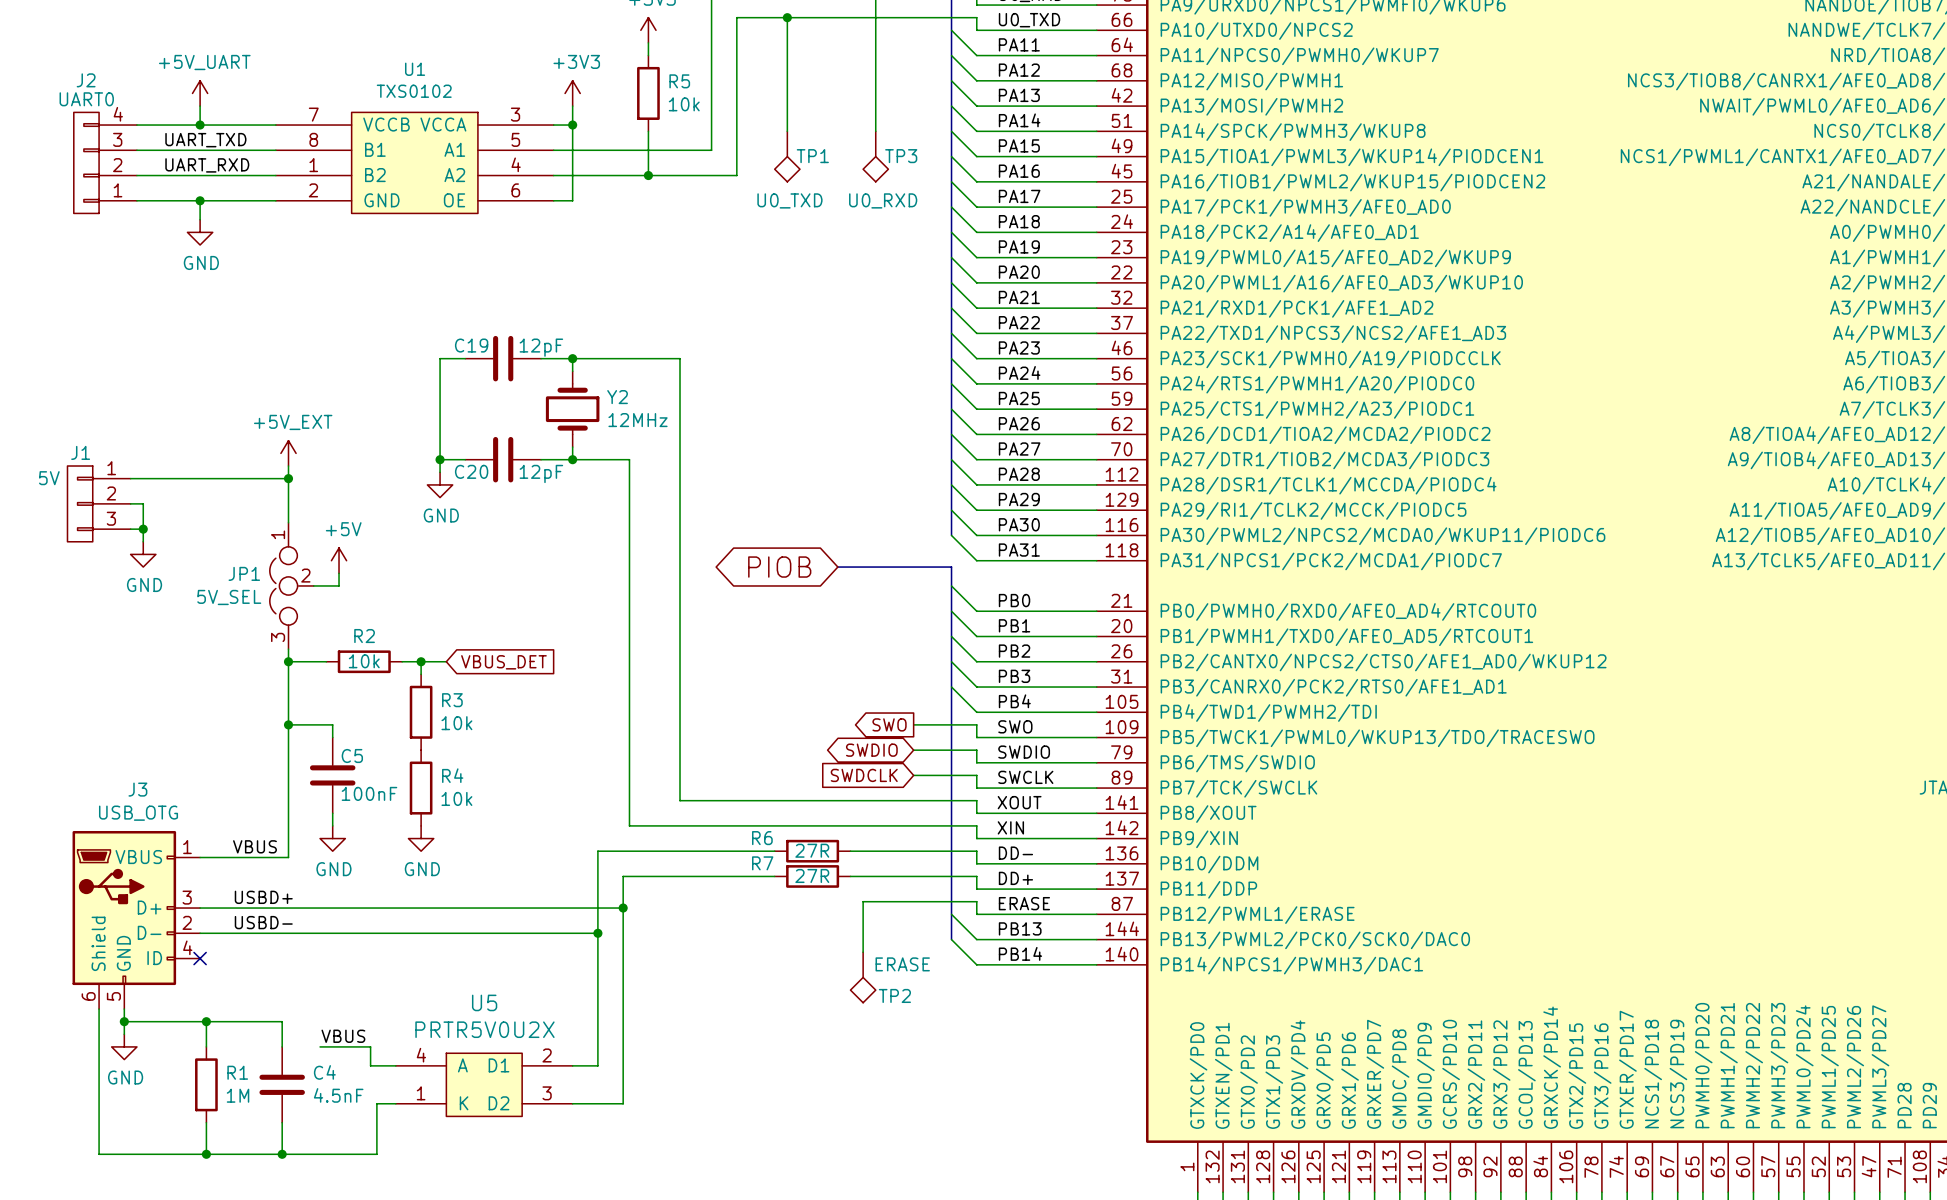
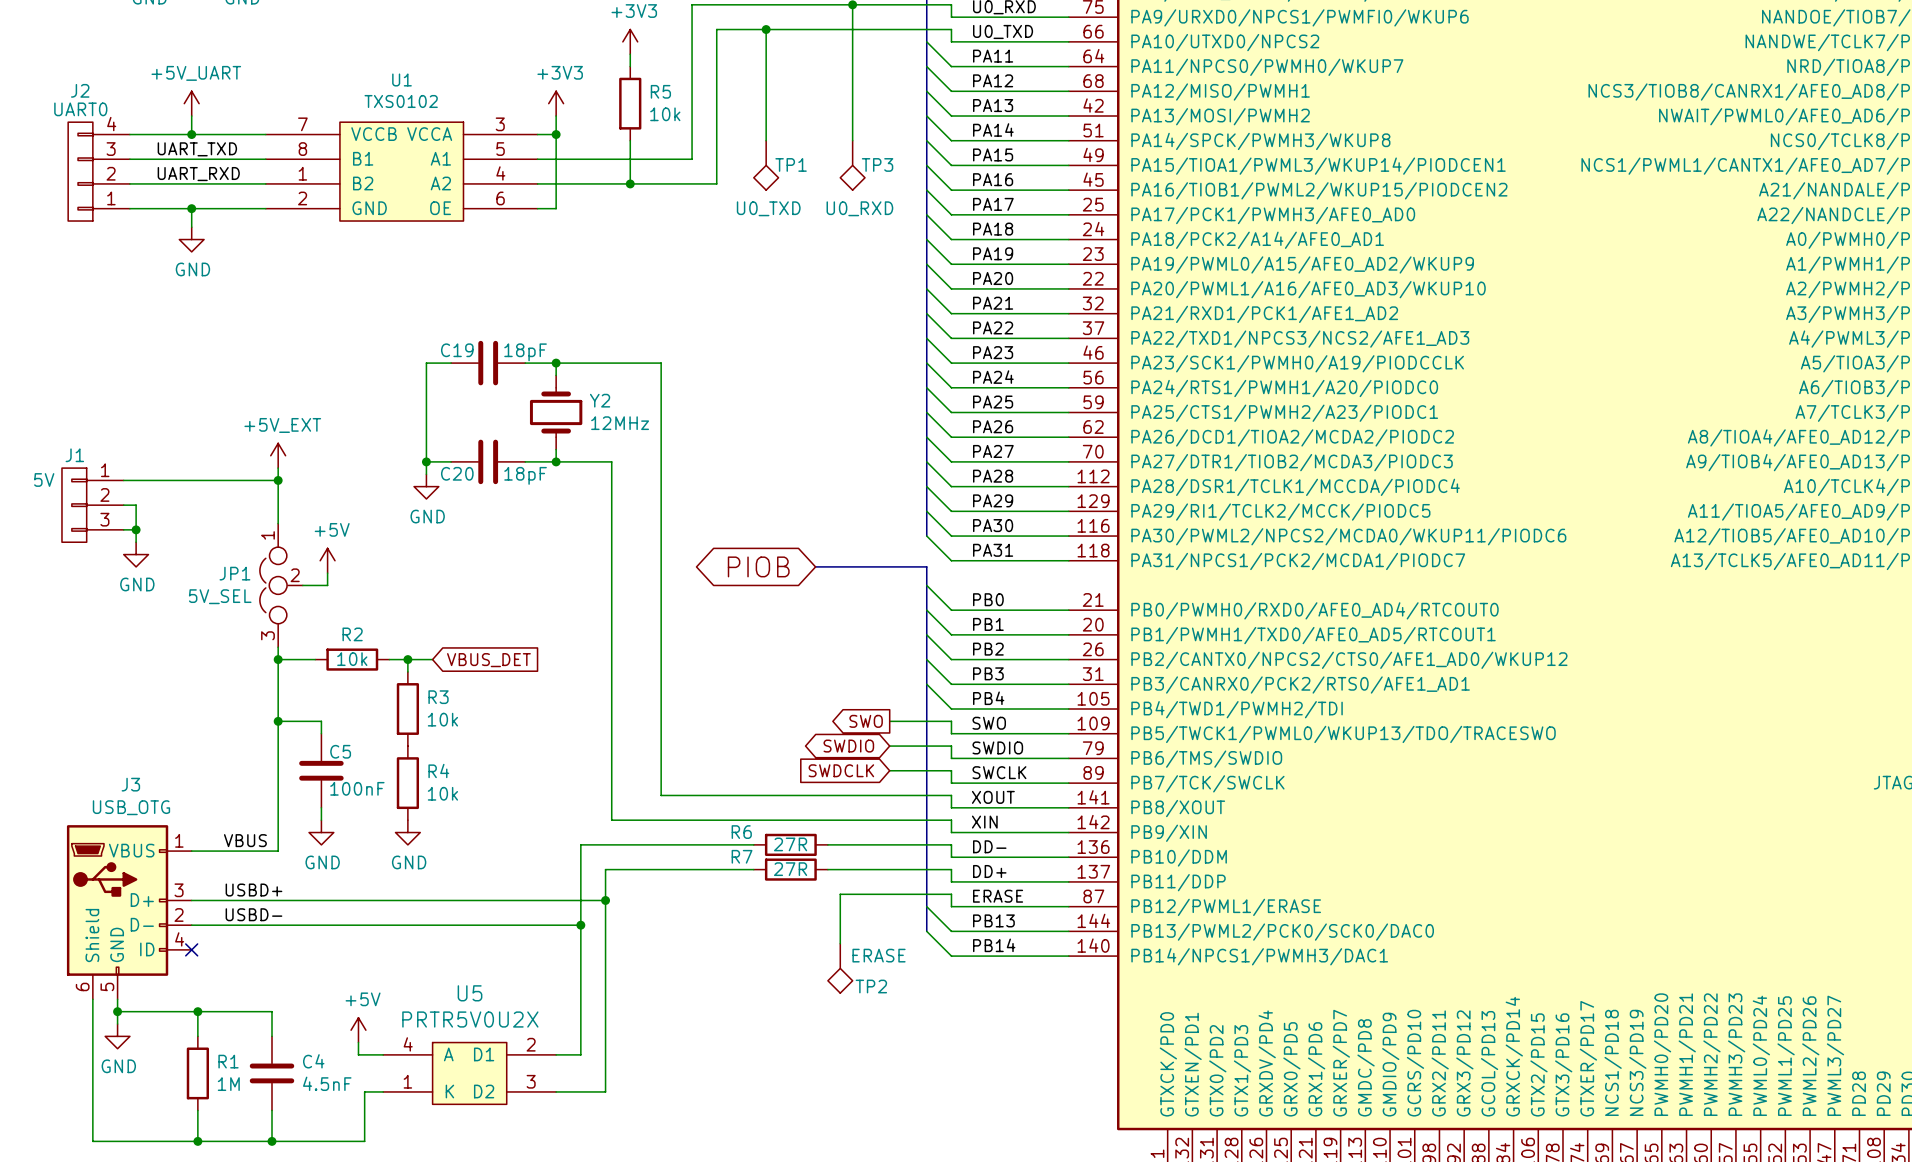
C19 value: 12pF (541, 347) -> 18pF (525, 352)
C20 value: 12pF (541, 473) -> 18pF (525, 475)
label: VBUS (343, 1036) -> none
power symbol: none -> +5V (358, 1030)
wire: (320, 1046) (370, 1046) (370, 1053) -> none

